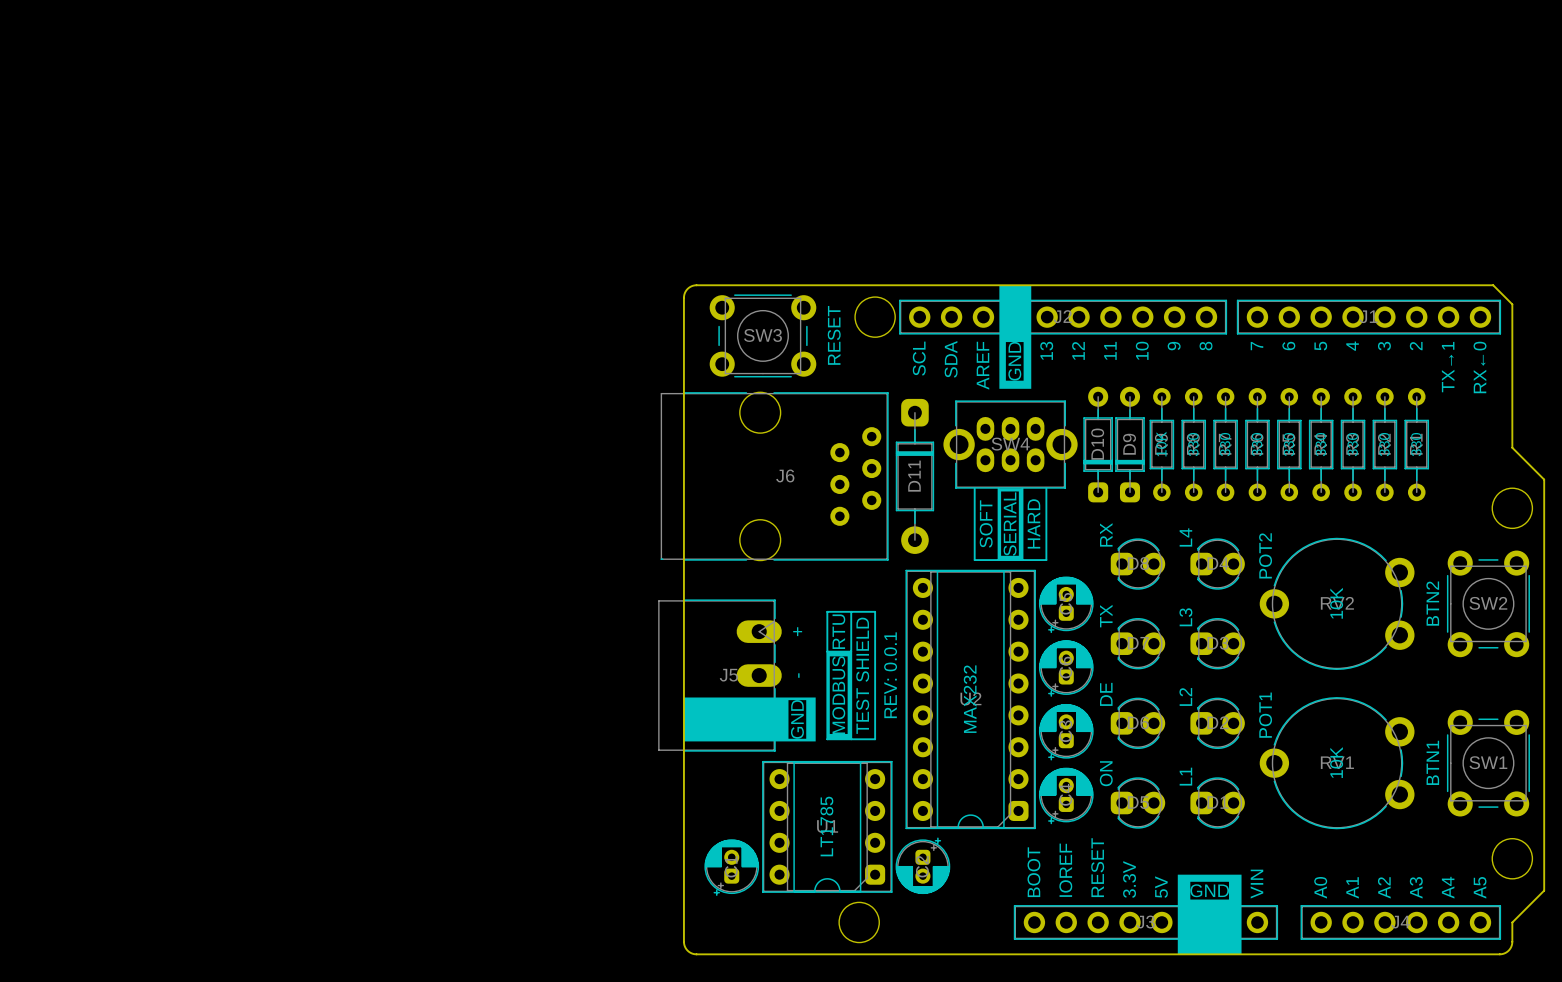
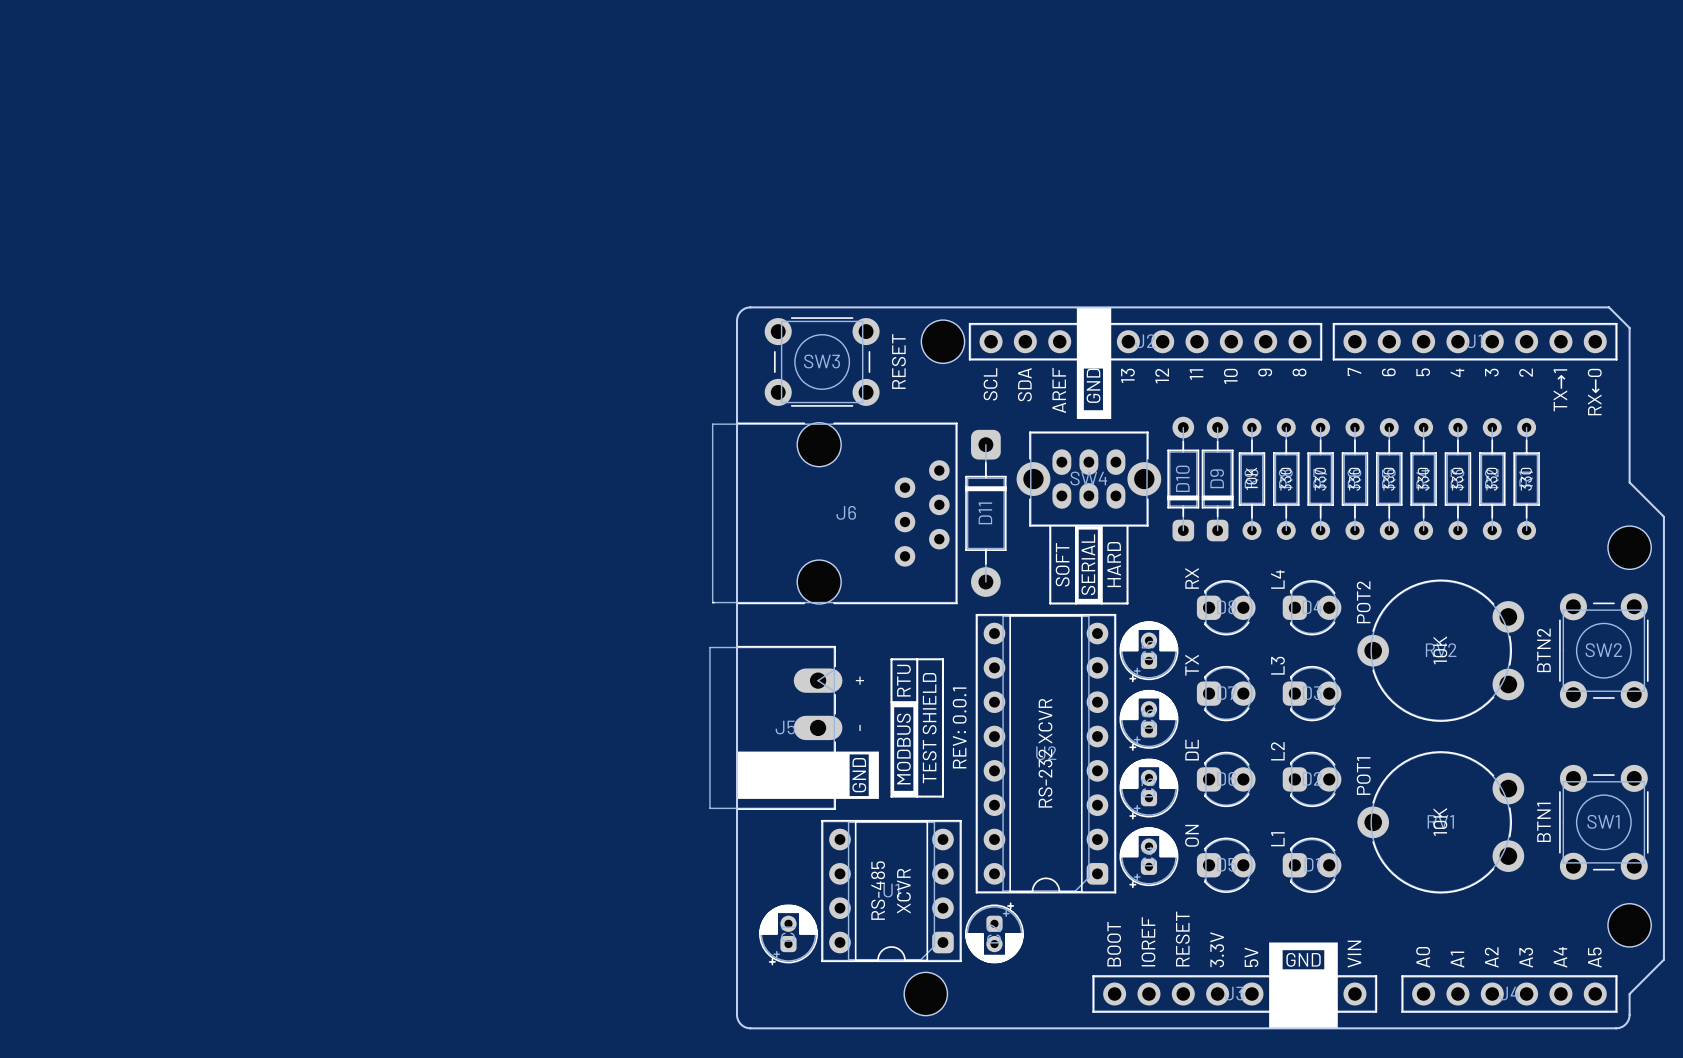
U2 value: MAX232 (970, 699) -> RS-232 XCVR (1045, 753)
U1 text: none -> RS-485 (878, 890)
U1 value: LT1785 (826, 826) -> none
U1 text: none -> XCVR (903, 891)

